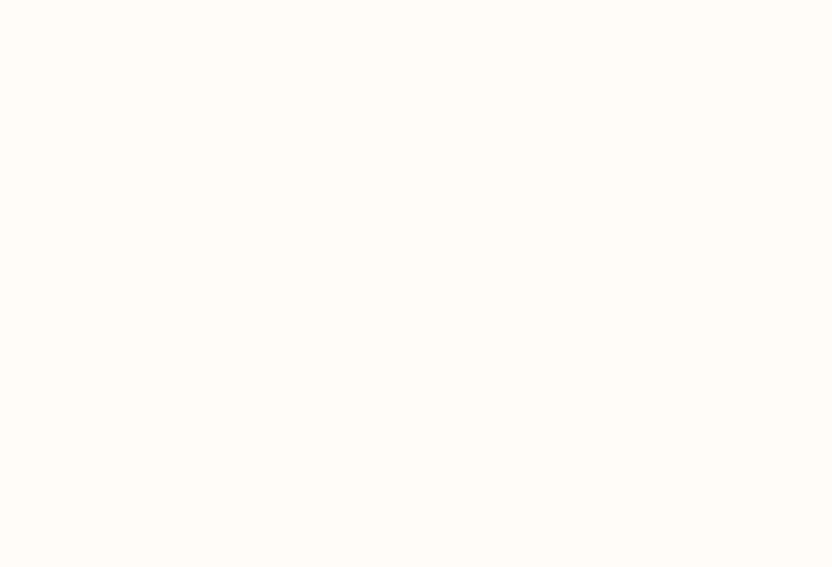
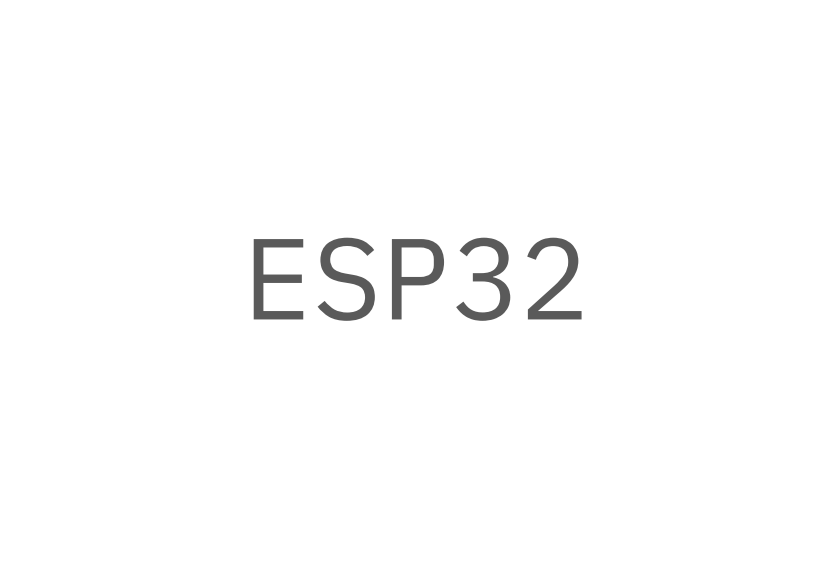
text: none -> ESP32 (417, 279)

